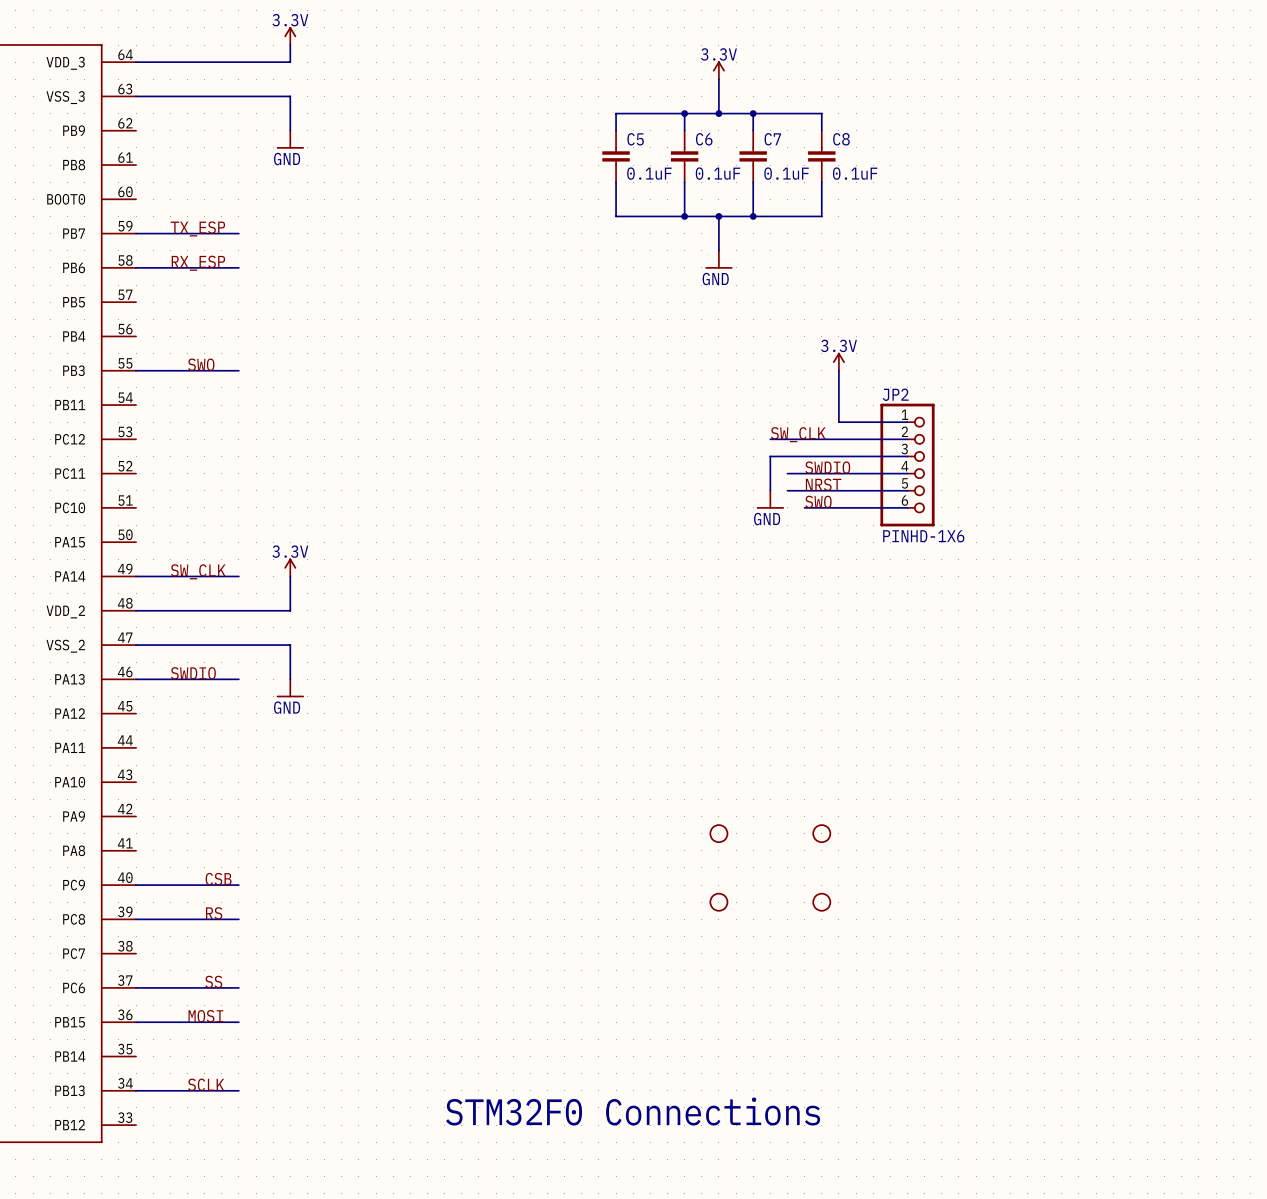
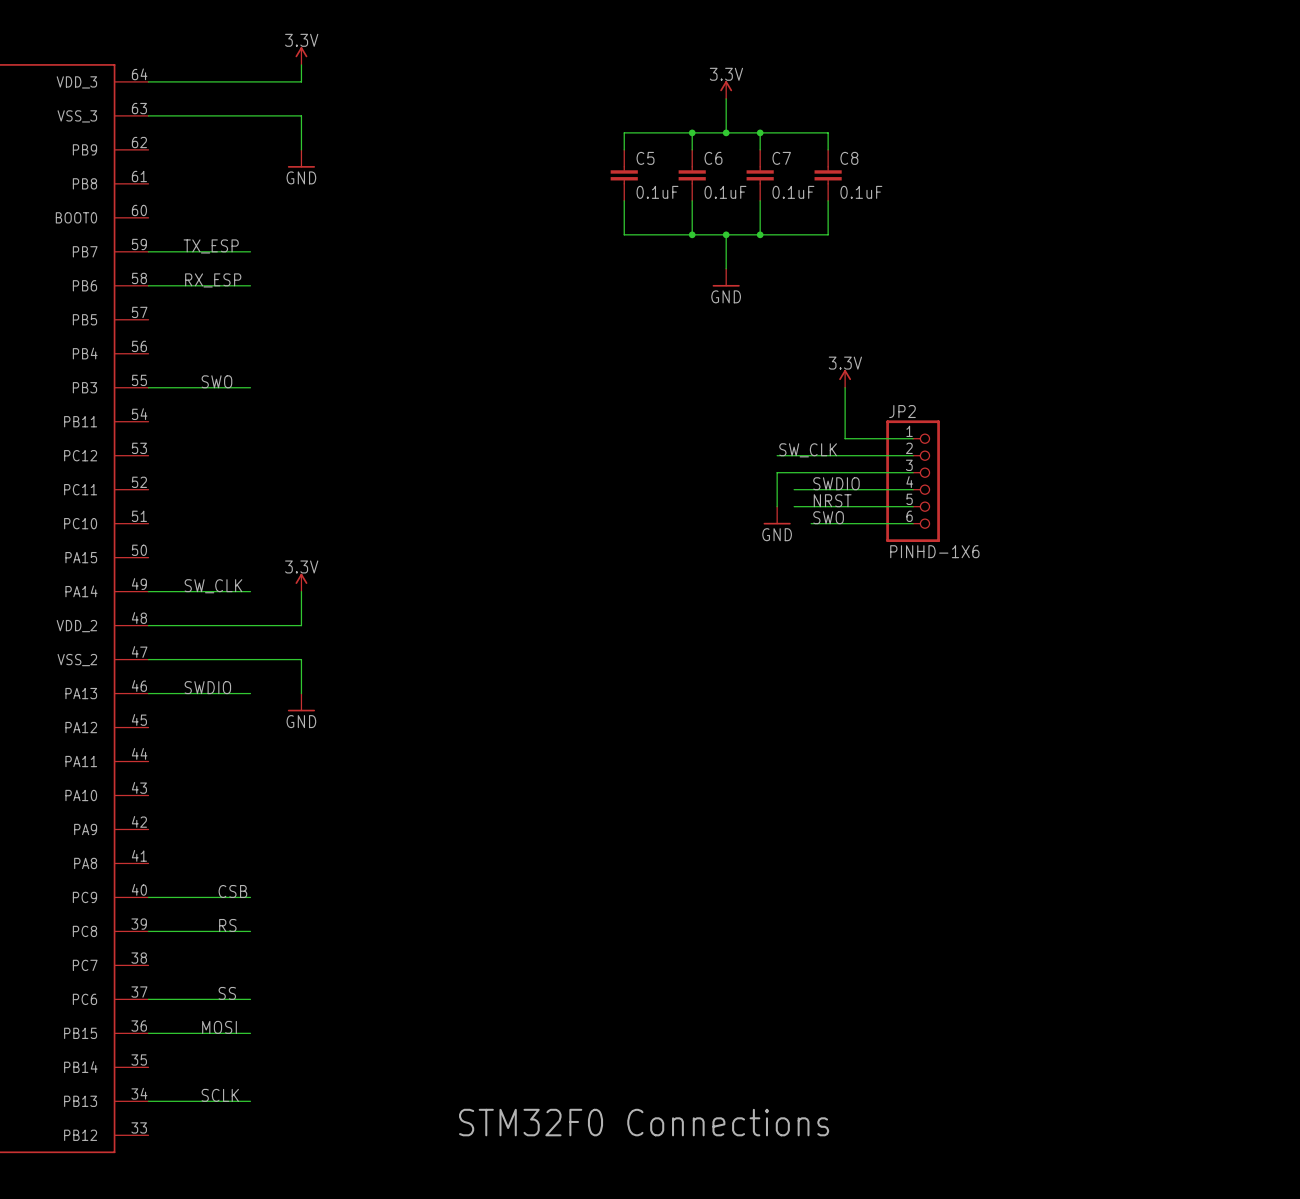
part: (718, 833) -> none
part: (821, 833) -> none
part: (718, 902) -> none
part: (821, 902) -> none

